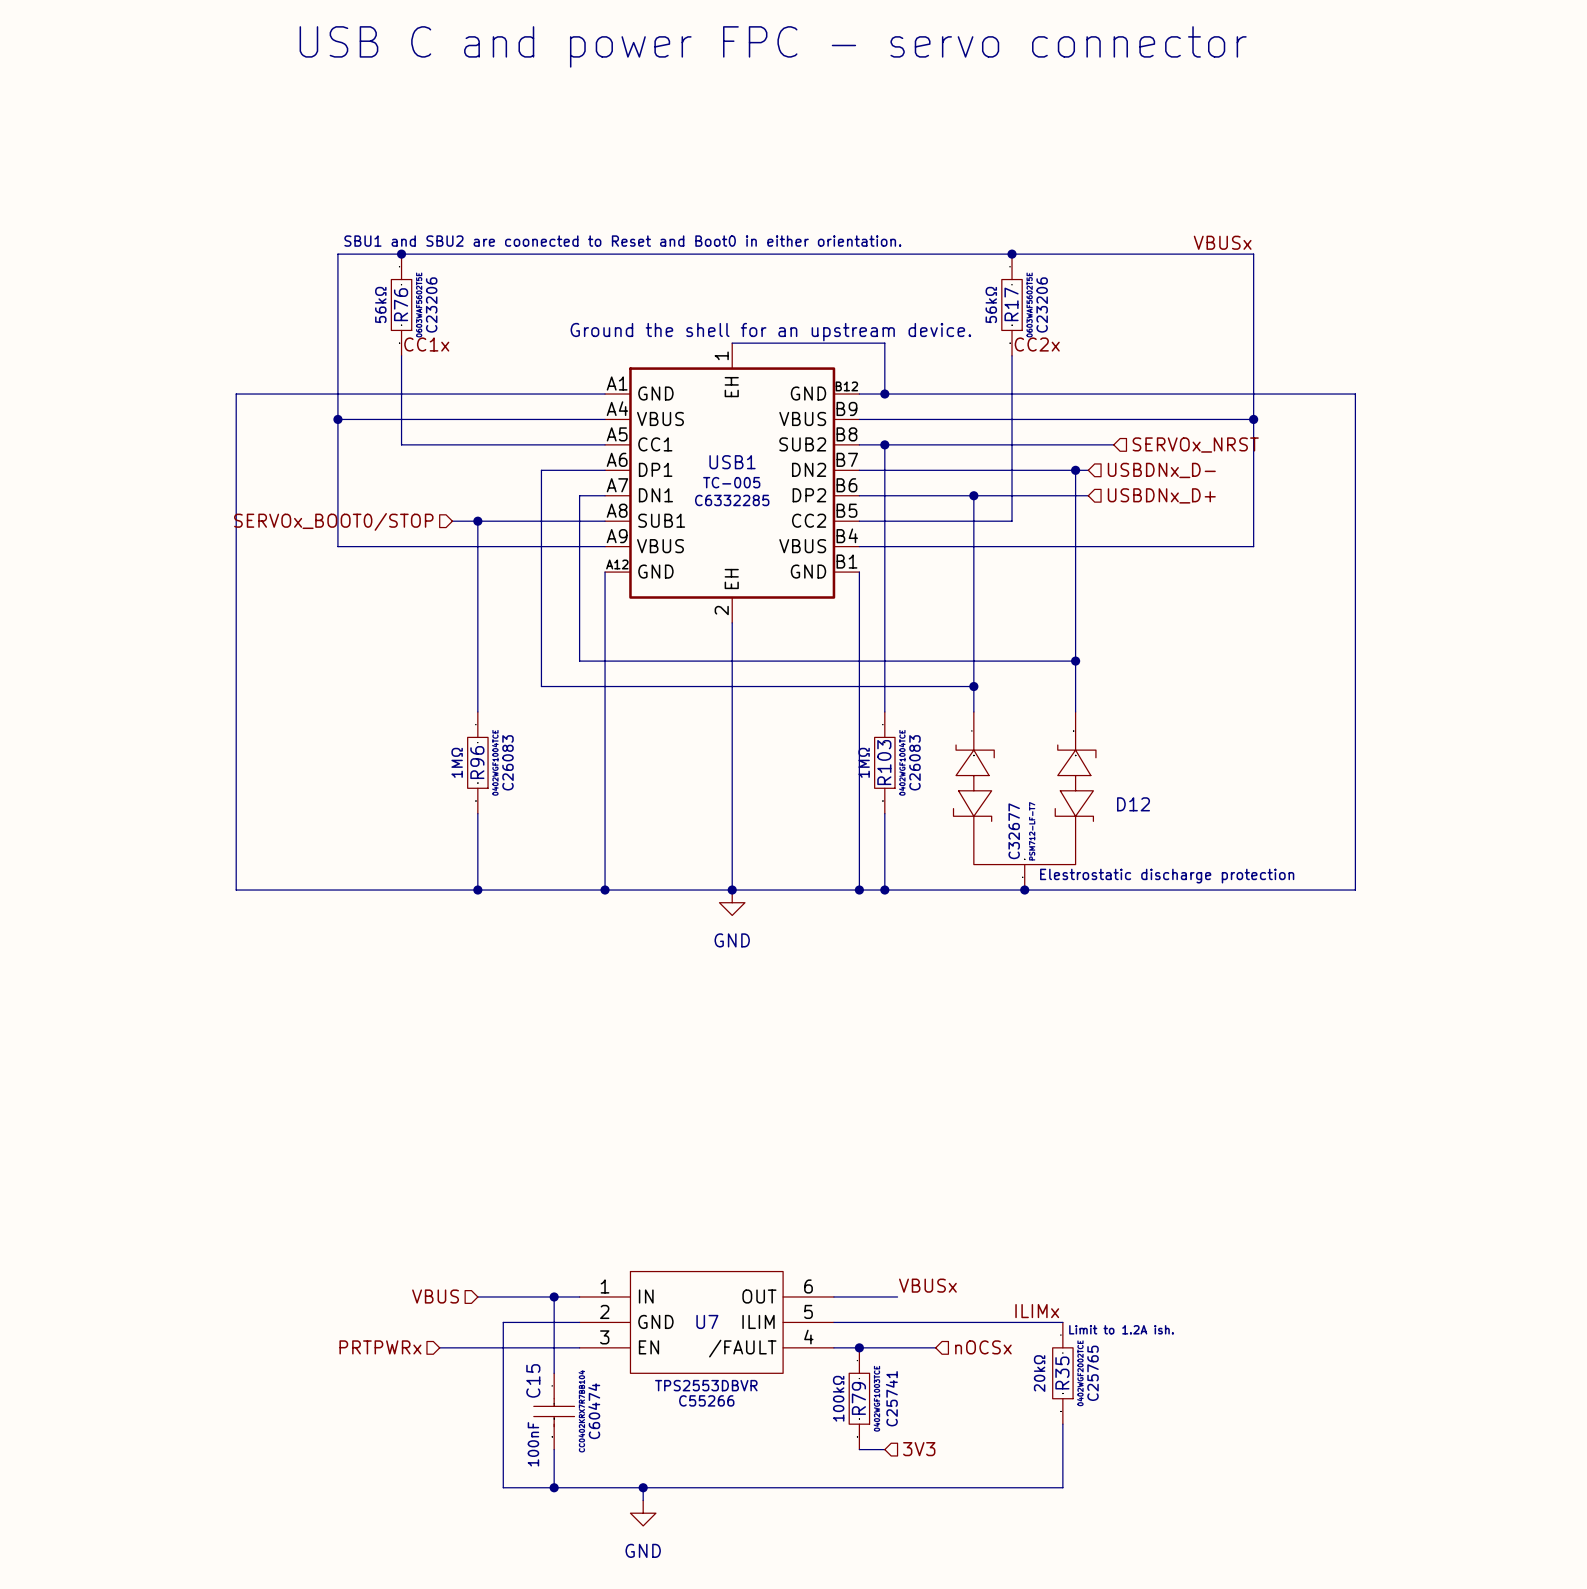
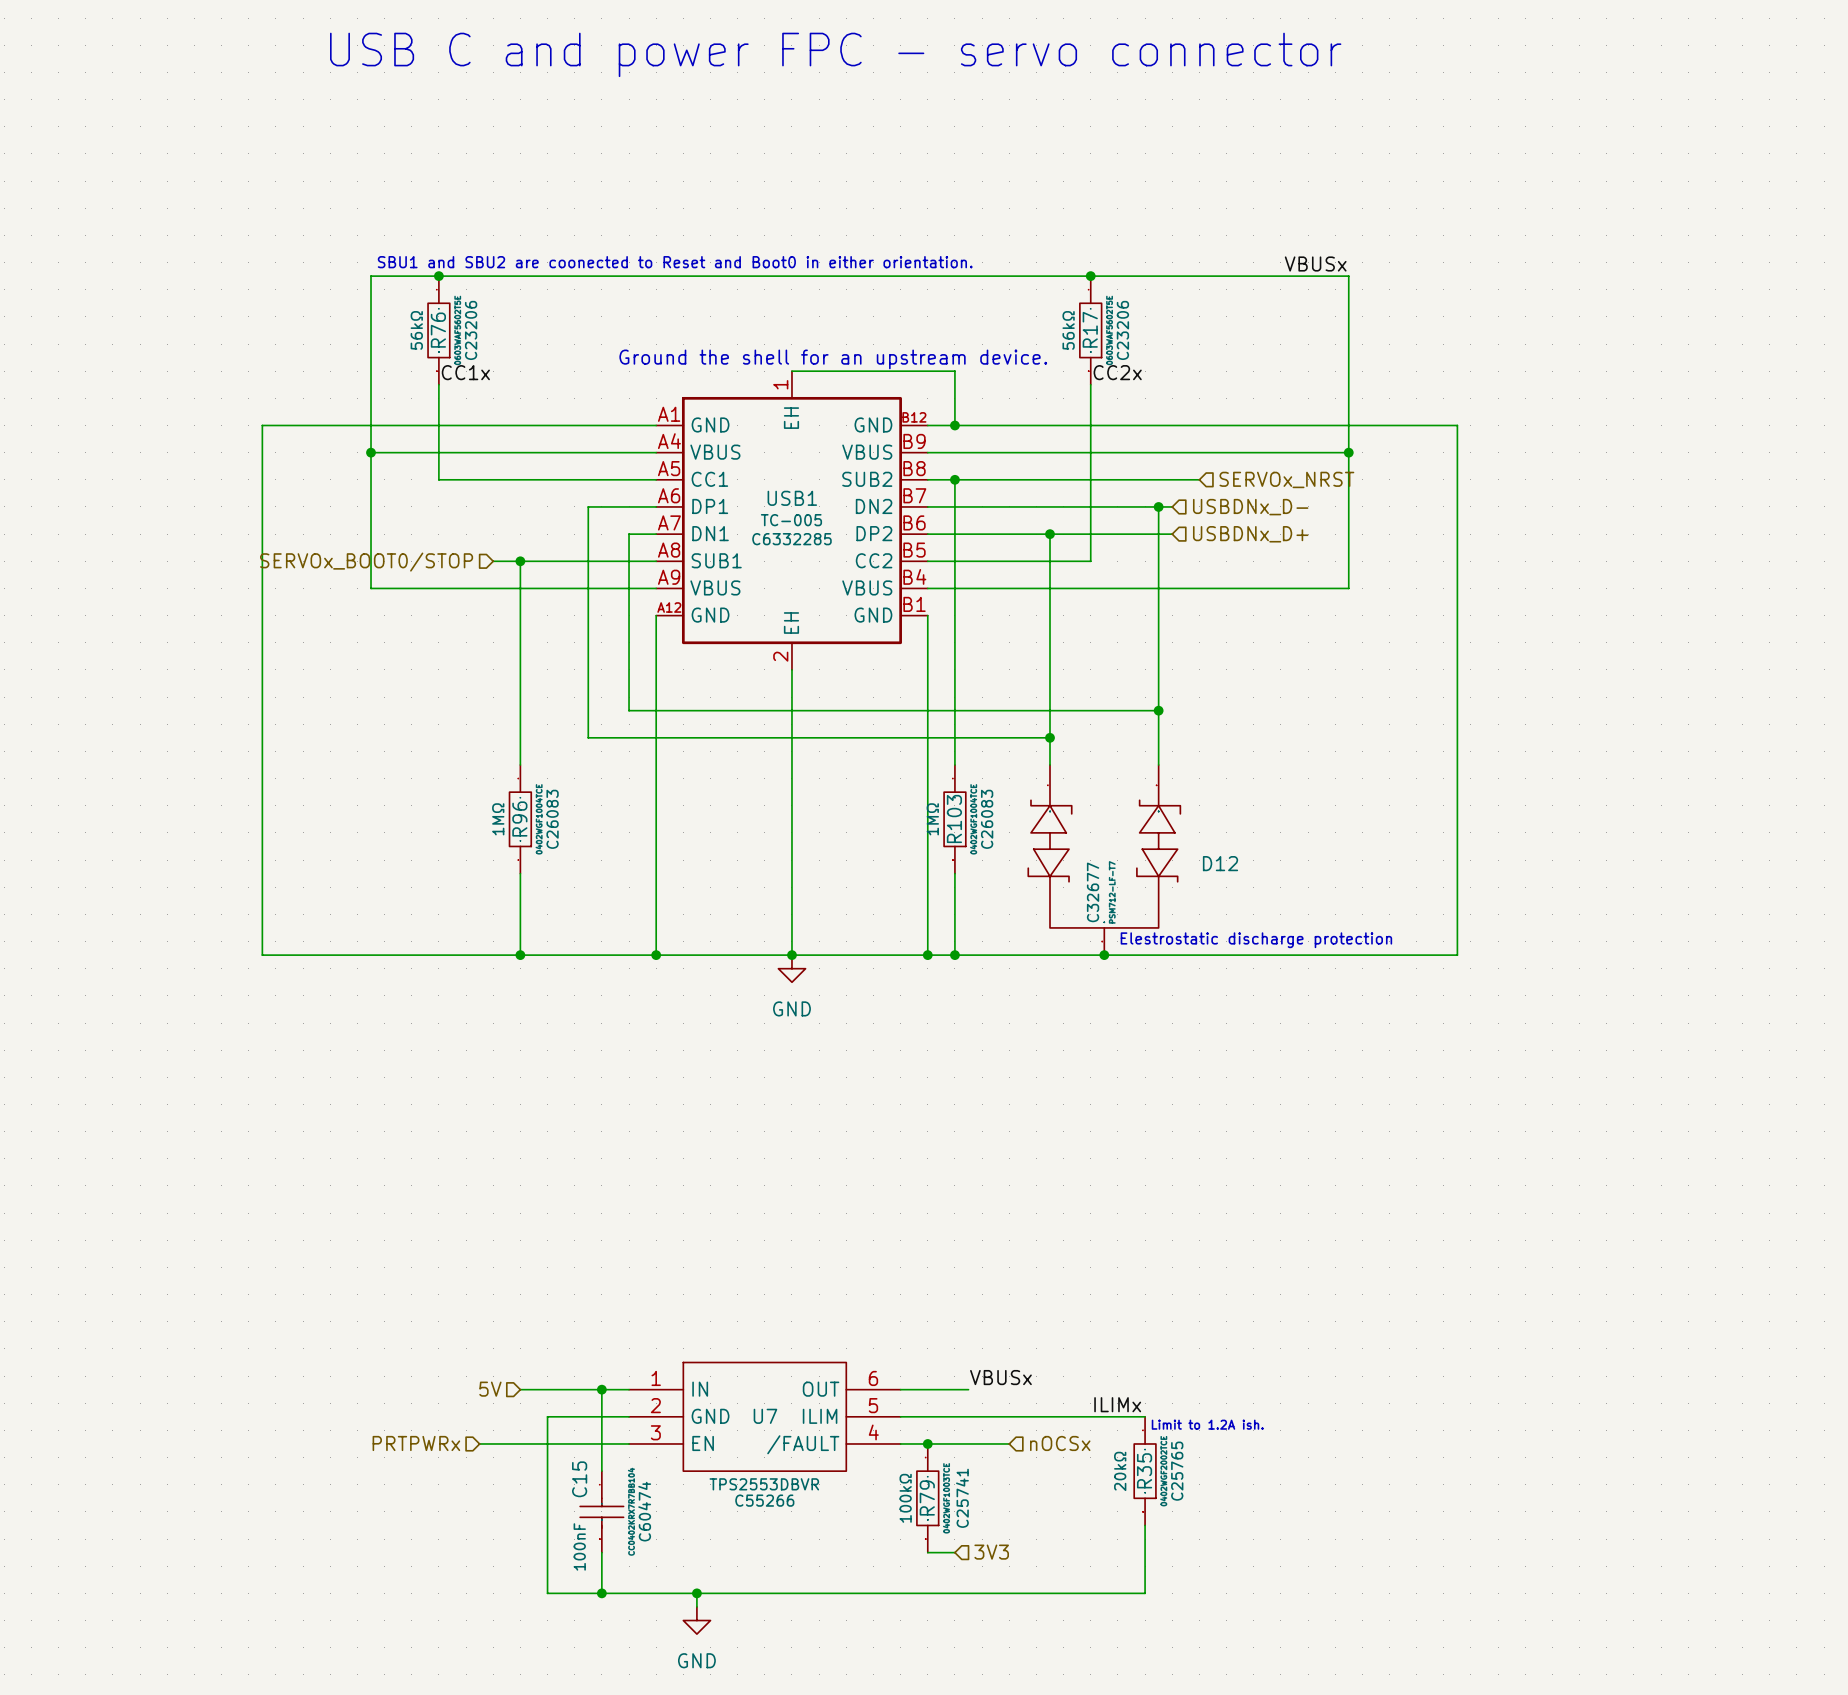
hierarchical label: VBUS (435, 1296) -> 5V (490, 1389)

